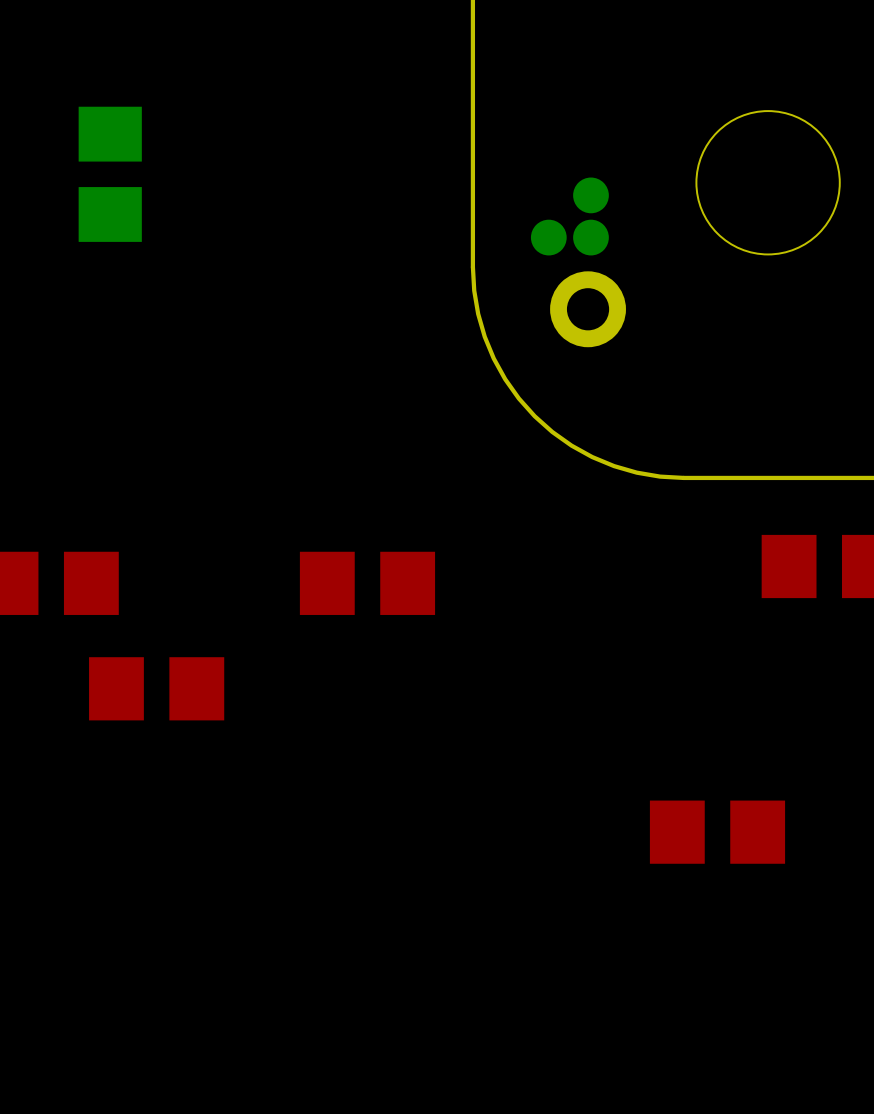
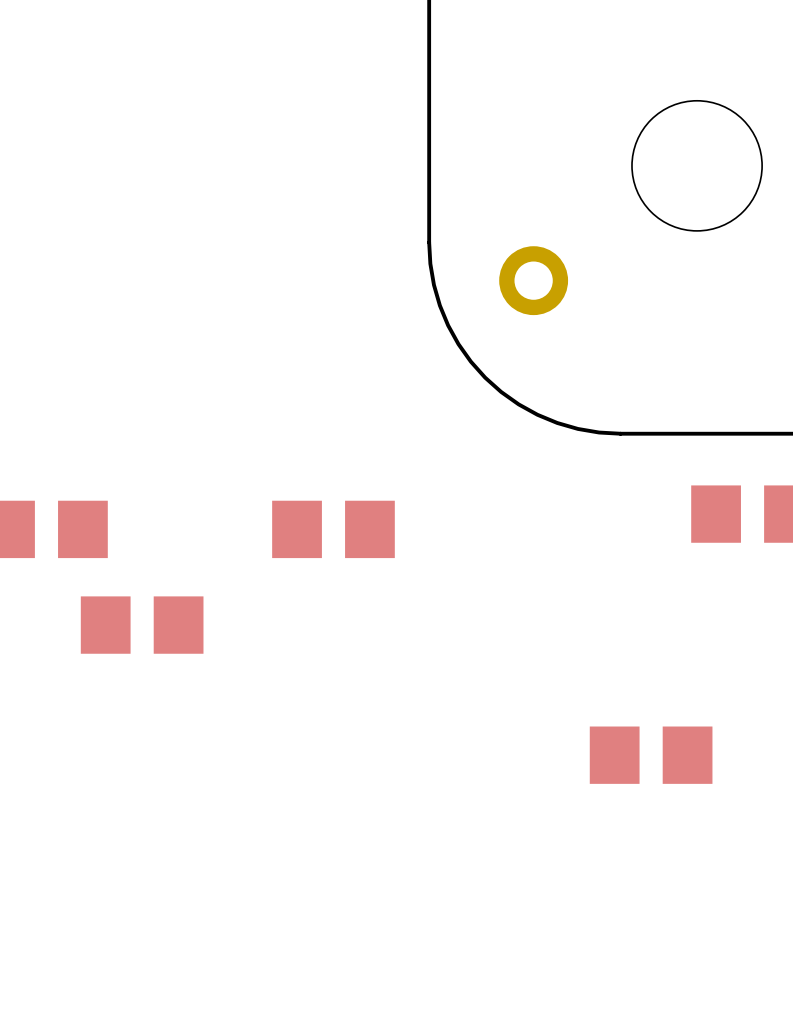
part: (110, 174) -> none
part: (590, 195) -> none
part: (548, 237) -> none
part: (590, 237) -> none

